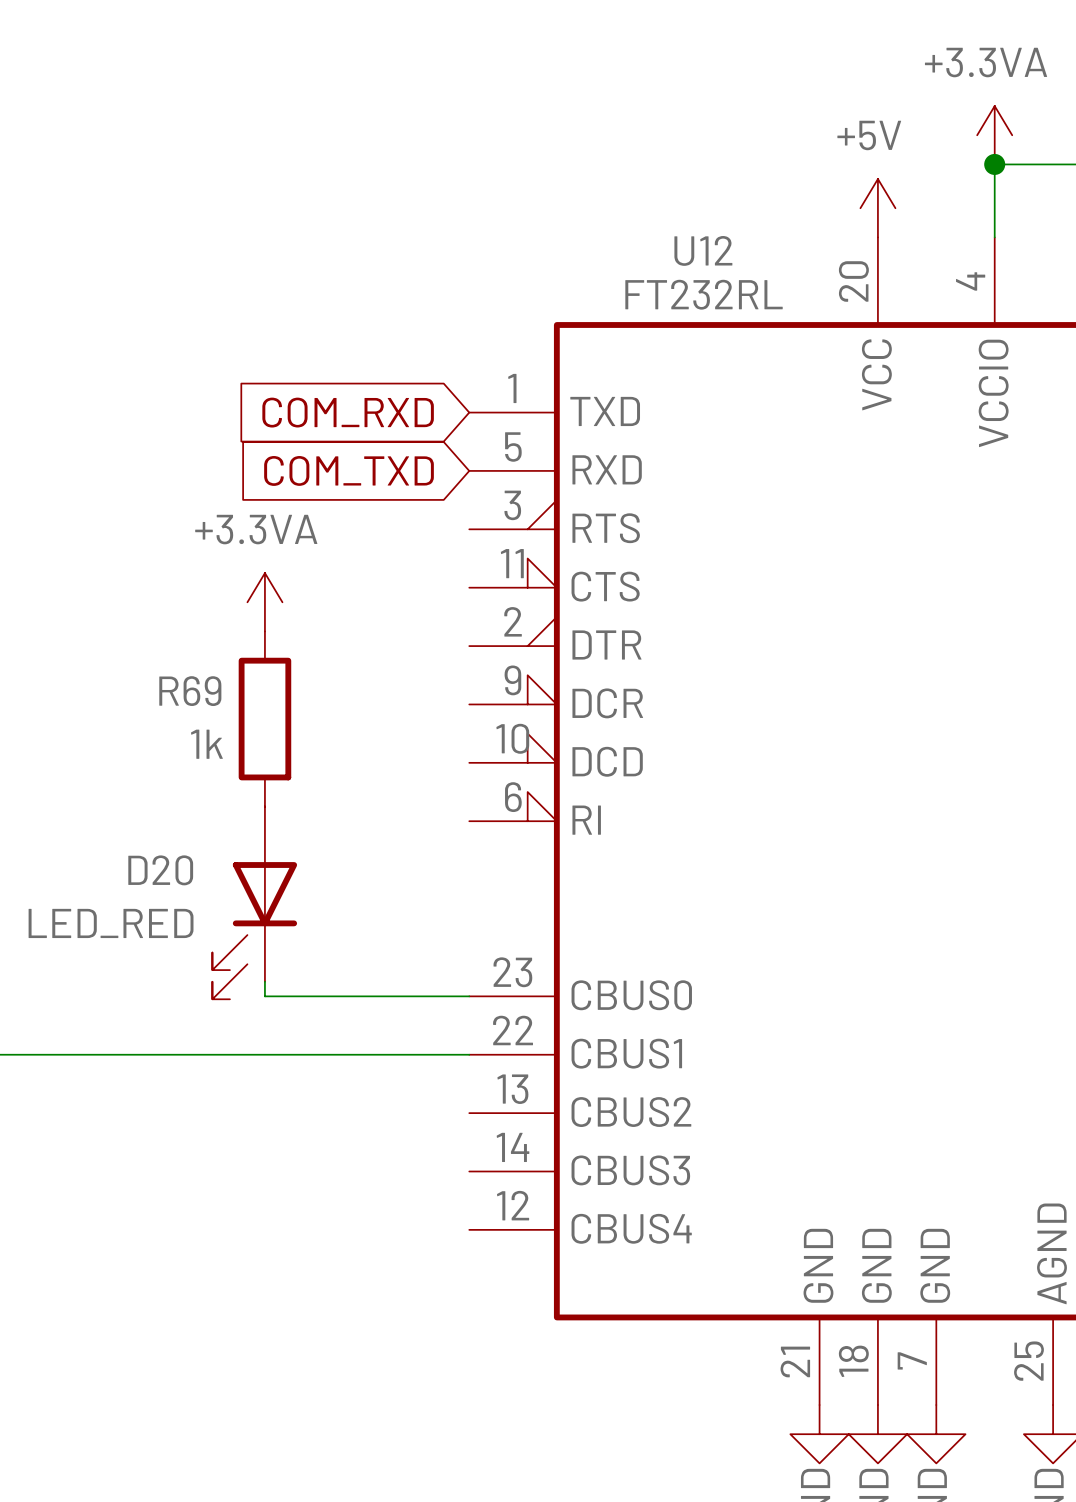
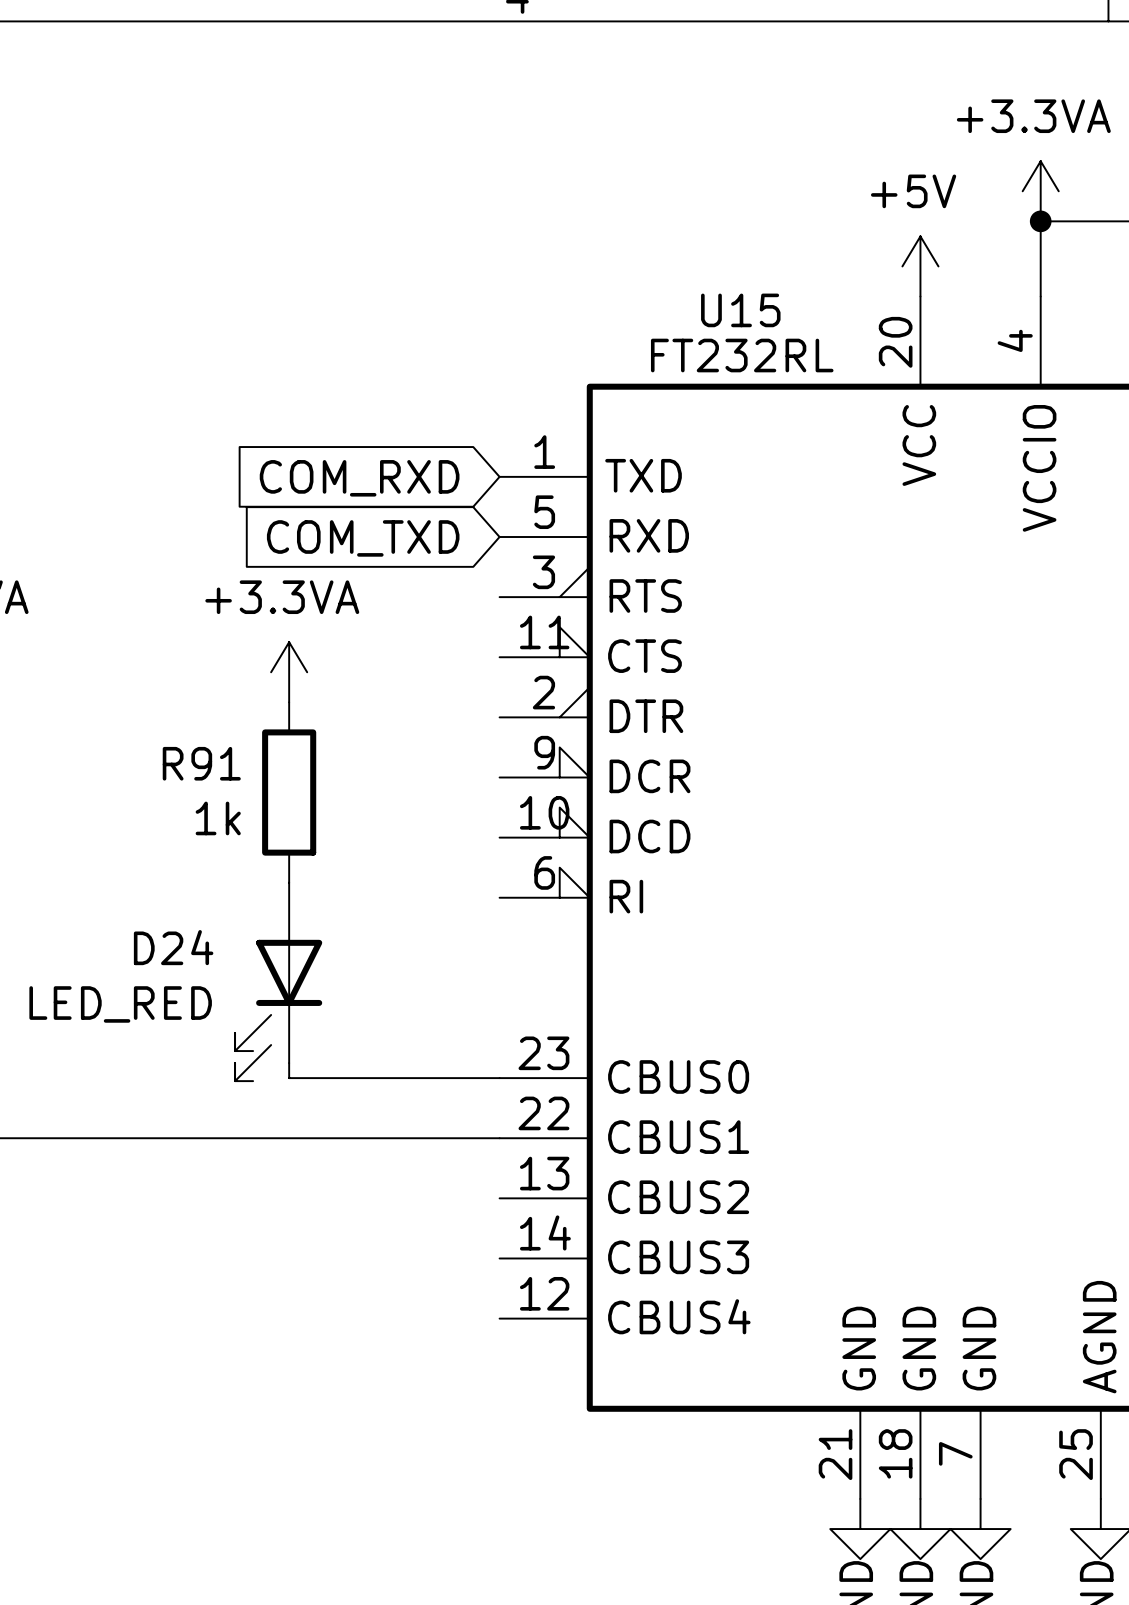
U12 name: U12 (703, 250) -> U15 (740, 310)
R69 name: R69 (190, 691) -> R91 (201, 763)
D20 name: D20 (160, 870) -> D24 (173, 947)

